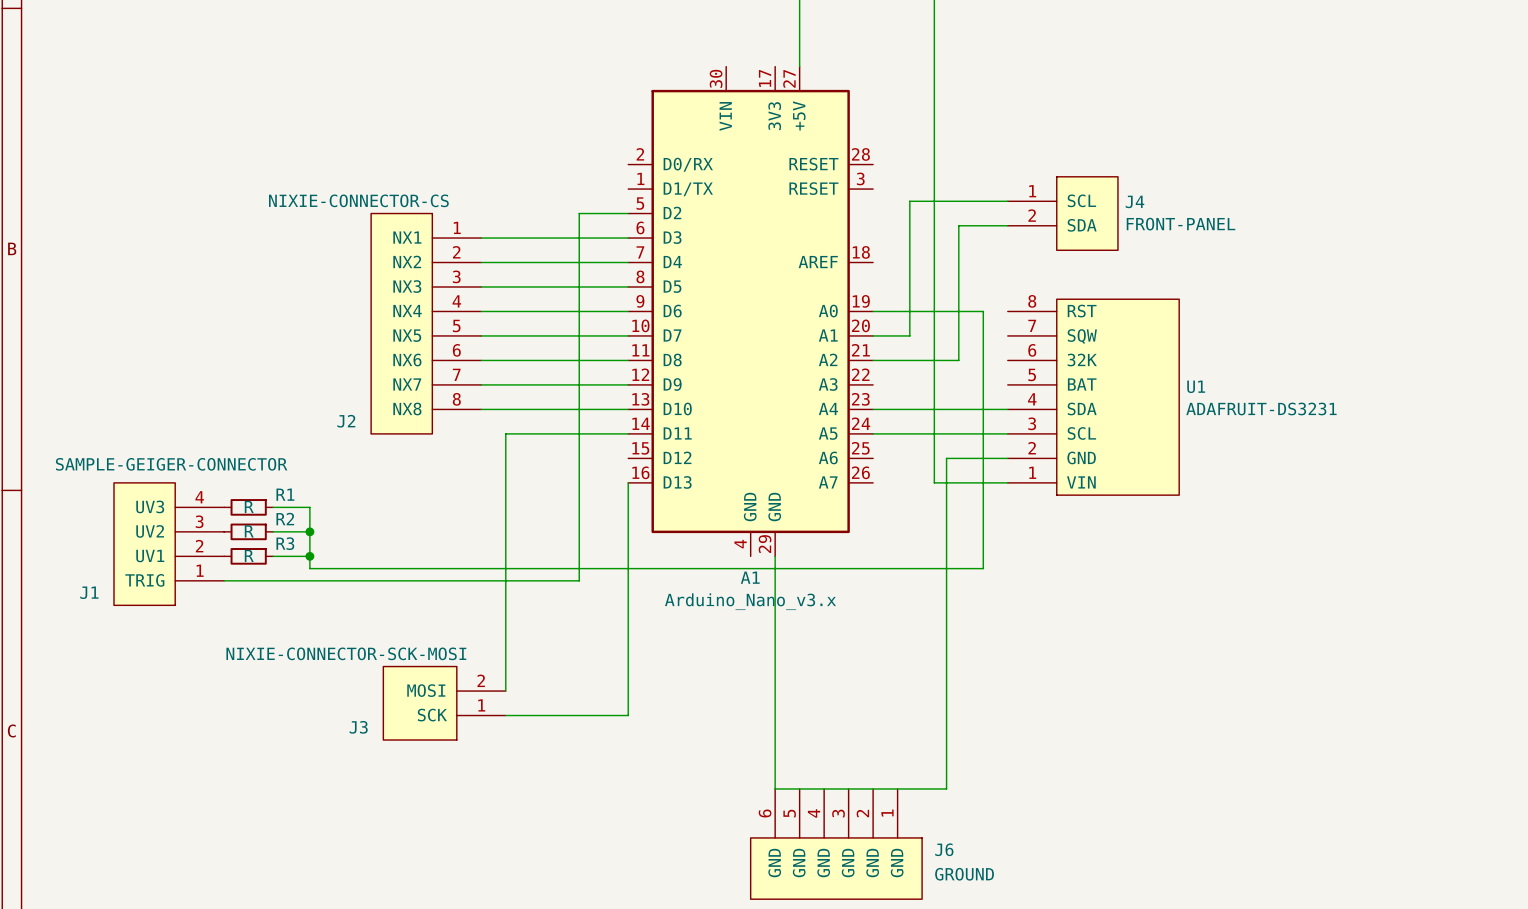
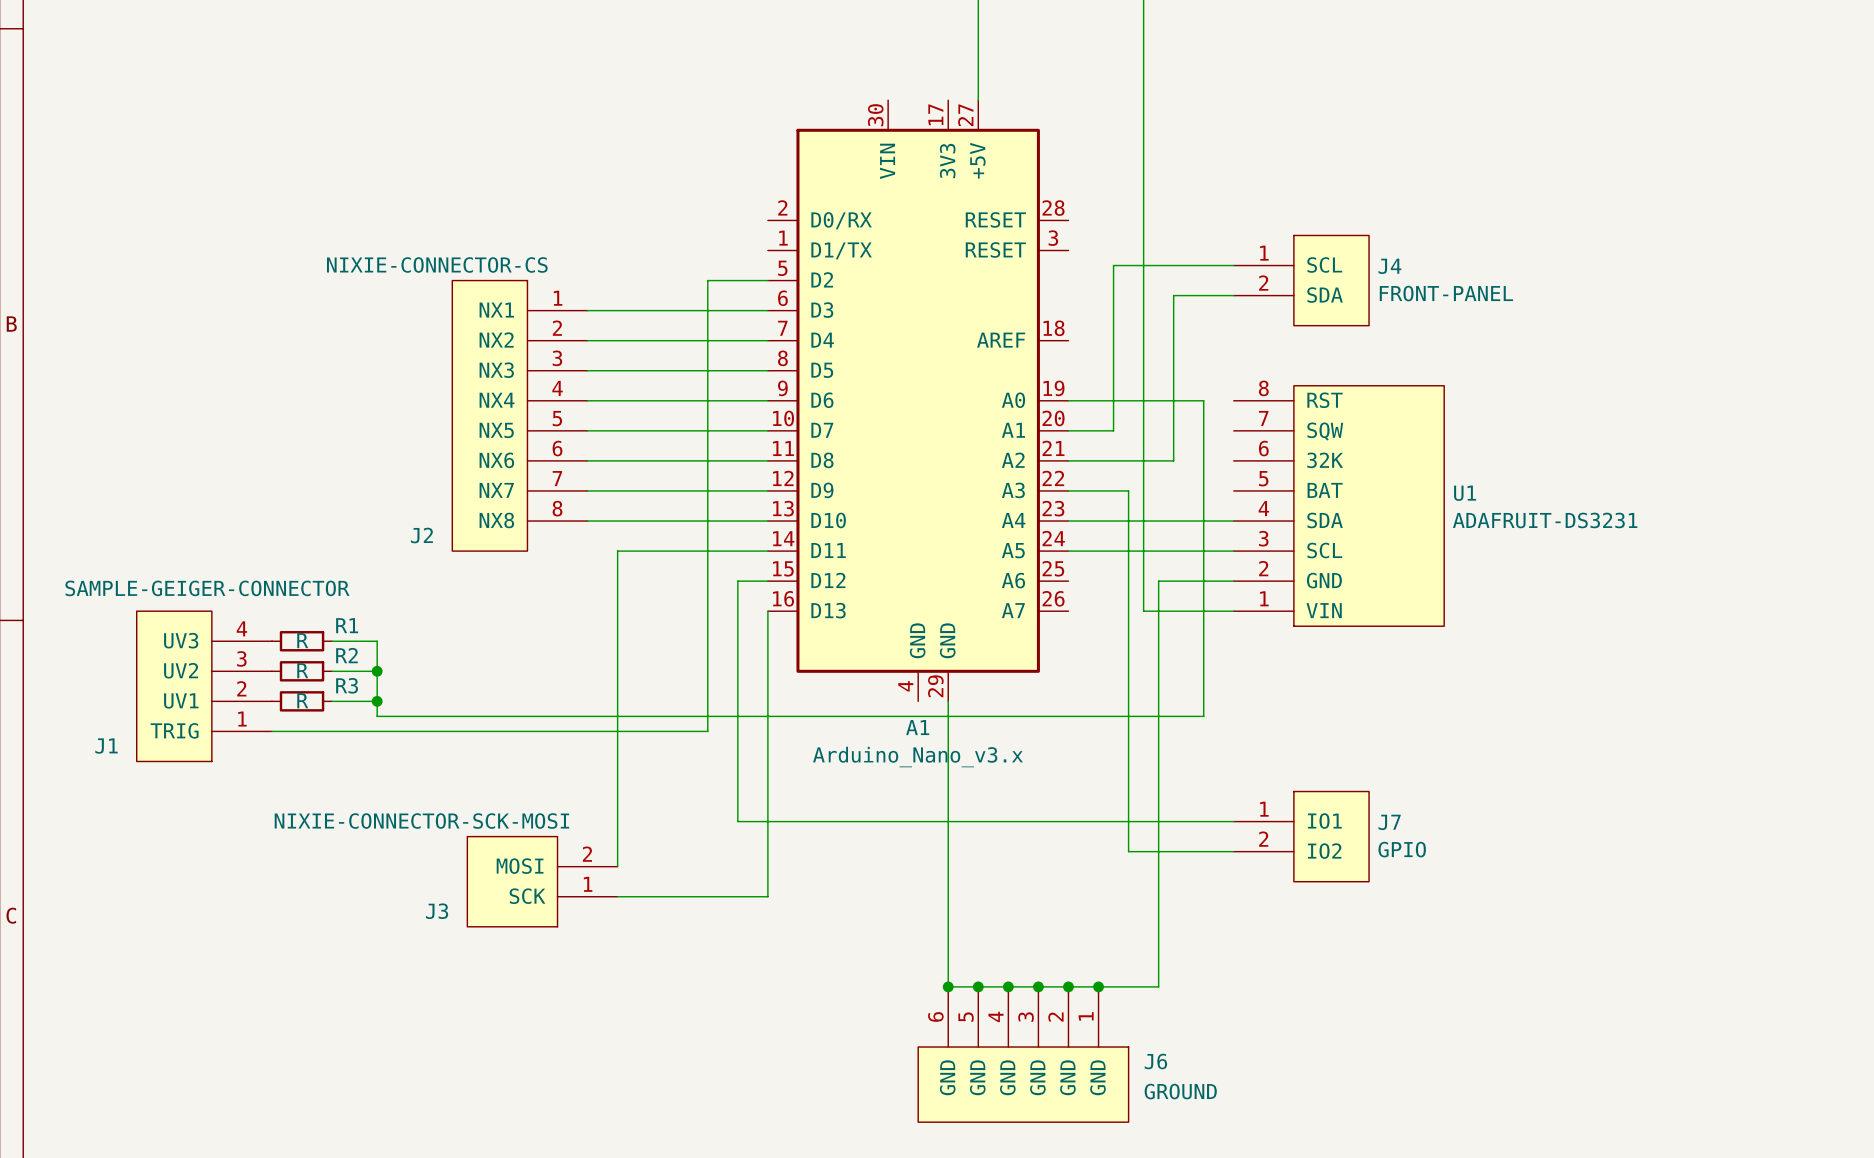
wire: none -> (1068, 490) (1128, 490) (1128, 851) (1233, 851)
wire: none -> (767, 581) (737, 581) (737, 821) (1233, 821)
J7: none -> GPIO (1301, 836)
junction: none -> (948, 986)
junction: none -> (978, 986)
junction: none -> (1008, 986)
junction: none -> (1038, 986)
junction: none -> (1068, 986)
junction: none -> (1098, 986)

